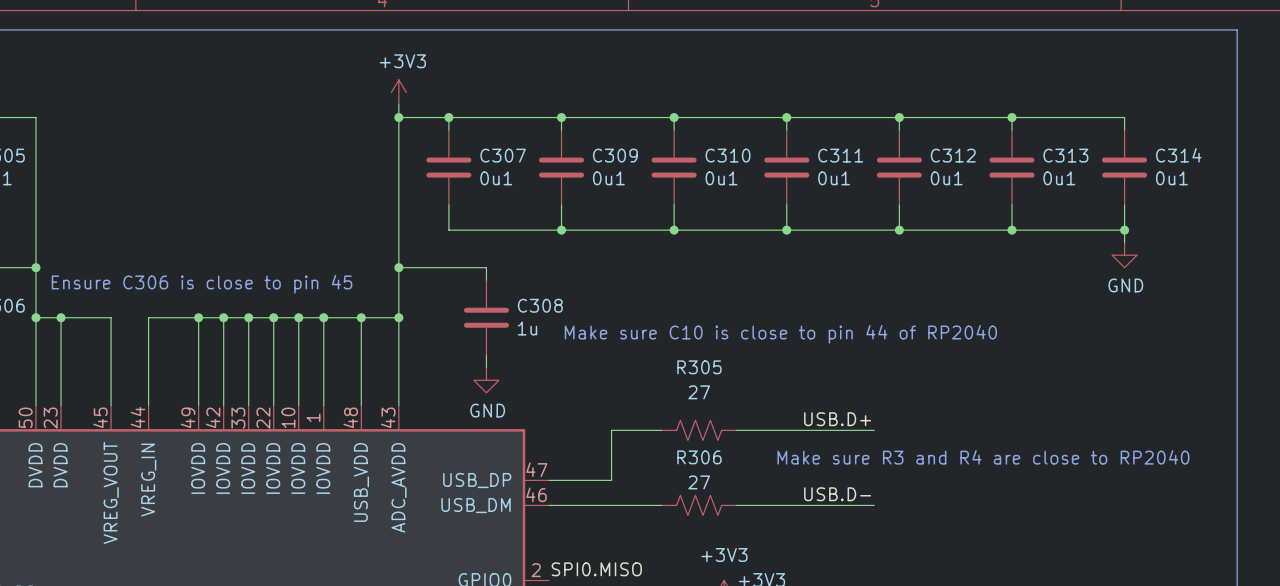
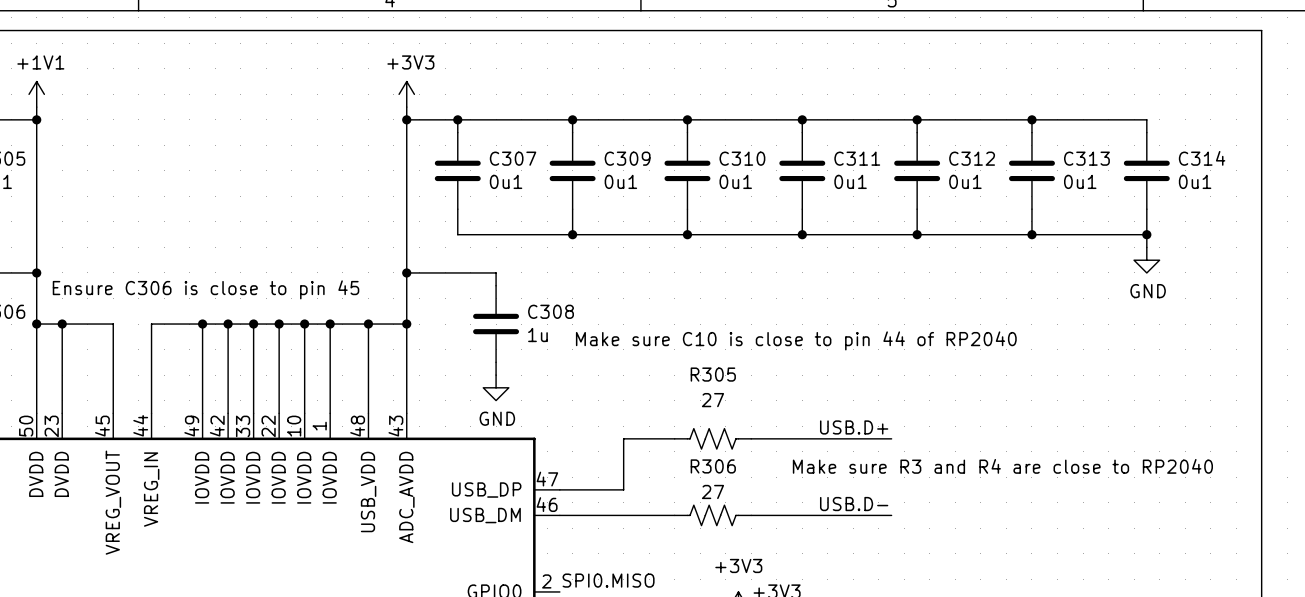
power symbol: none -> +1V1 (36, 94)
wire: none -> (36, 107) (36, 119)
junction: none -> (36, 119)

